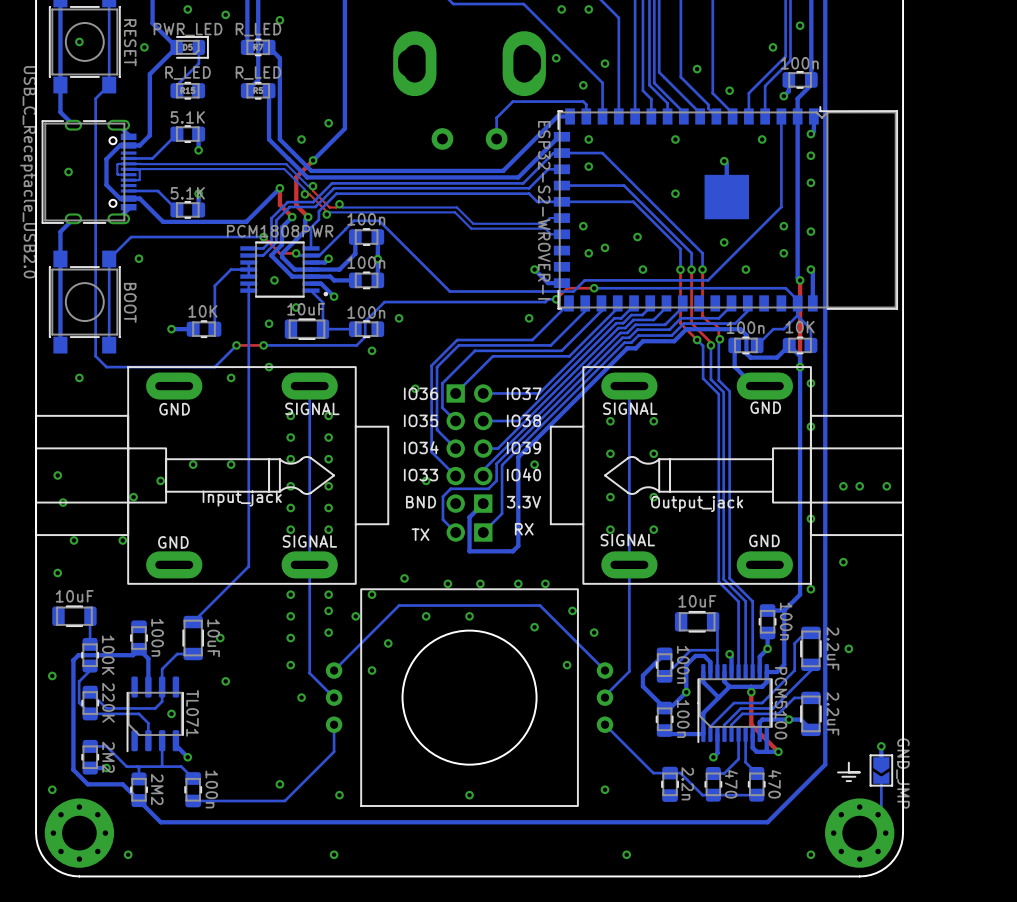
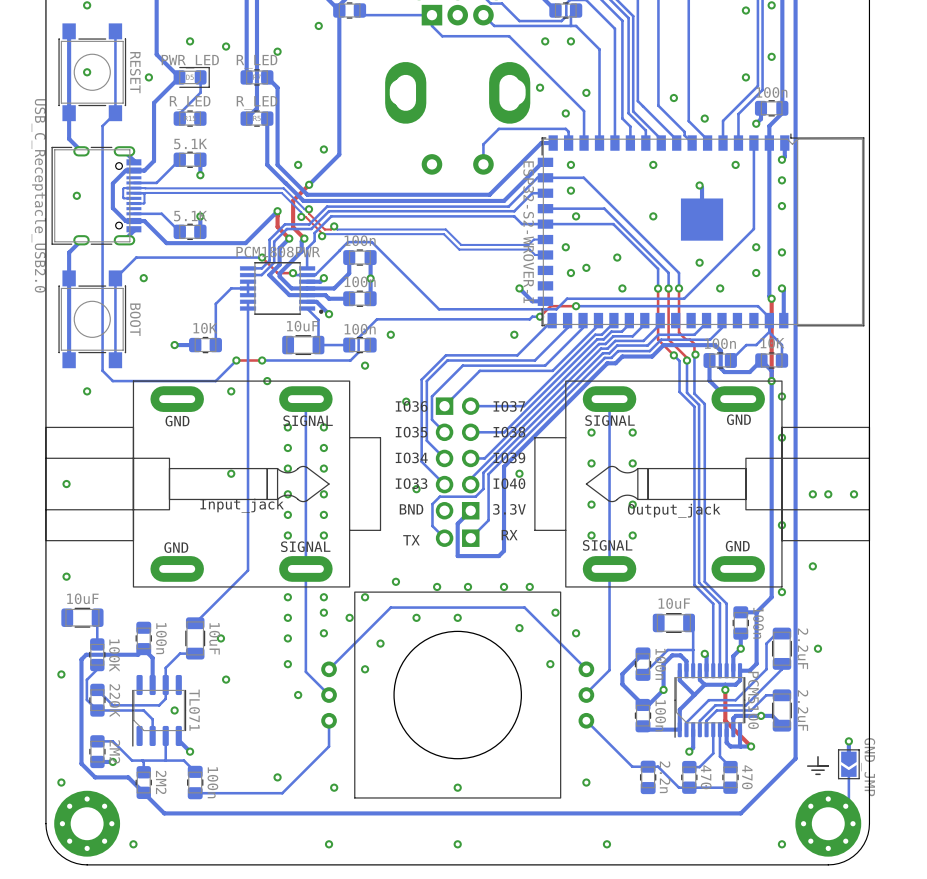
via: none -> (576, 216)
via: (274, 280) -> none
via: (296, 307) -> none
via: (269, 323) -> none
via: (193, 464) -> none
via: (160, 480) -> none
via: (133, 497) -> none
via: (63, 502) -> none
via: (73, 540) -> none
via: (122, 540) -> none
via: none -> (457, 844)

